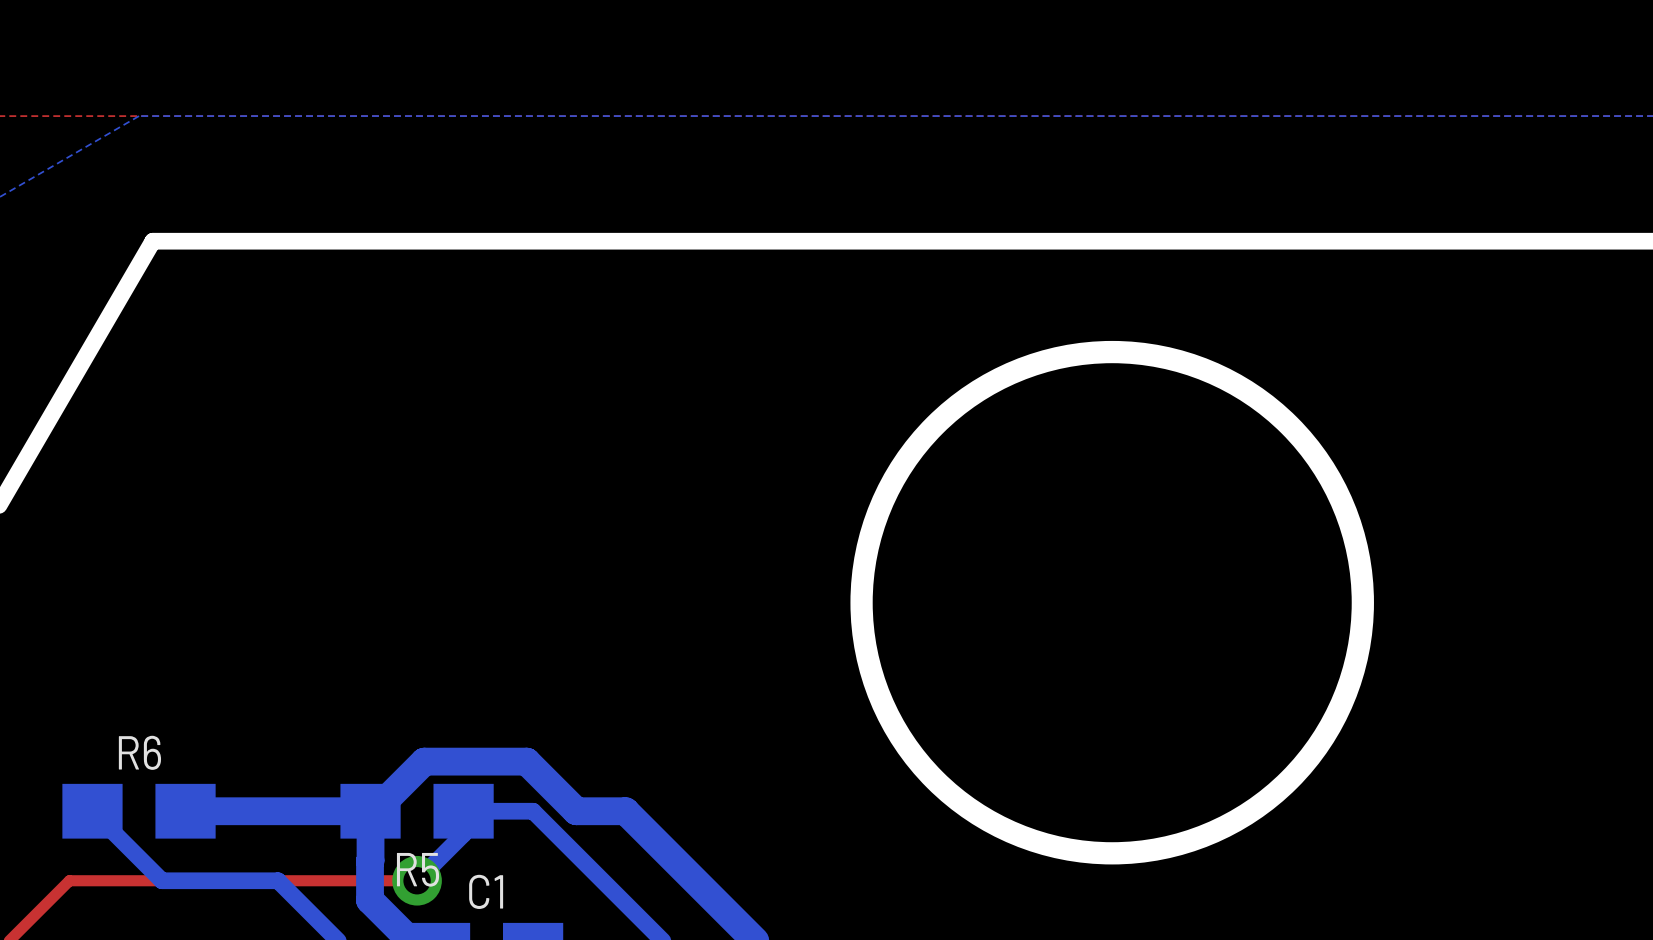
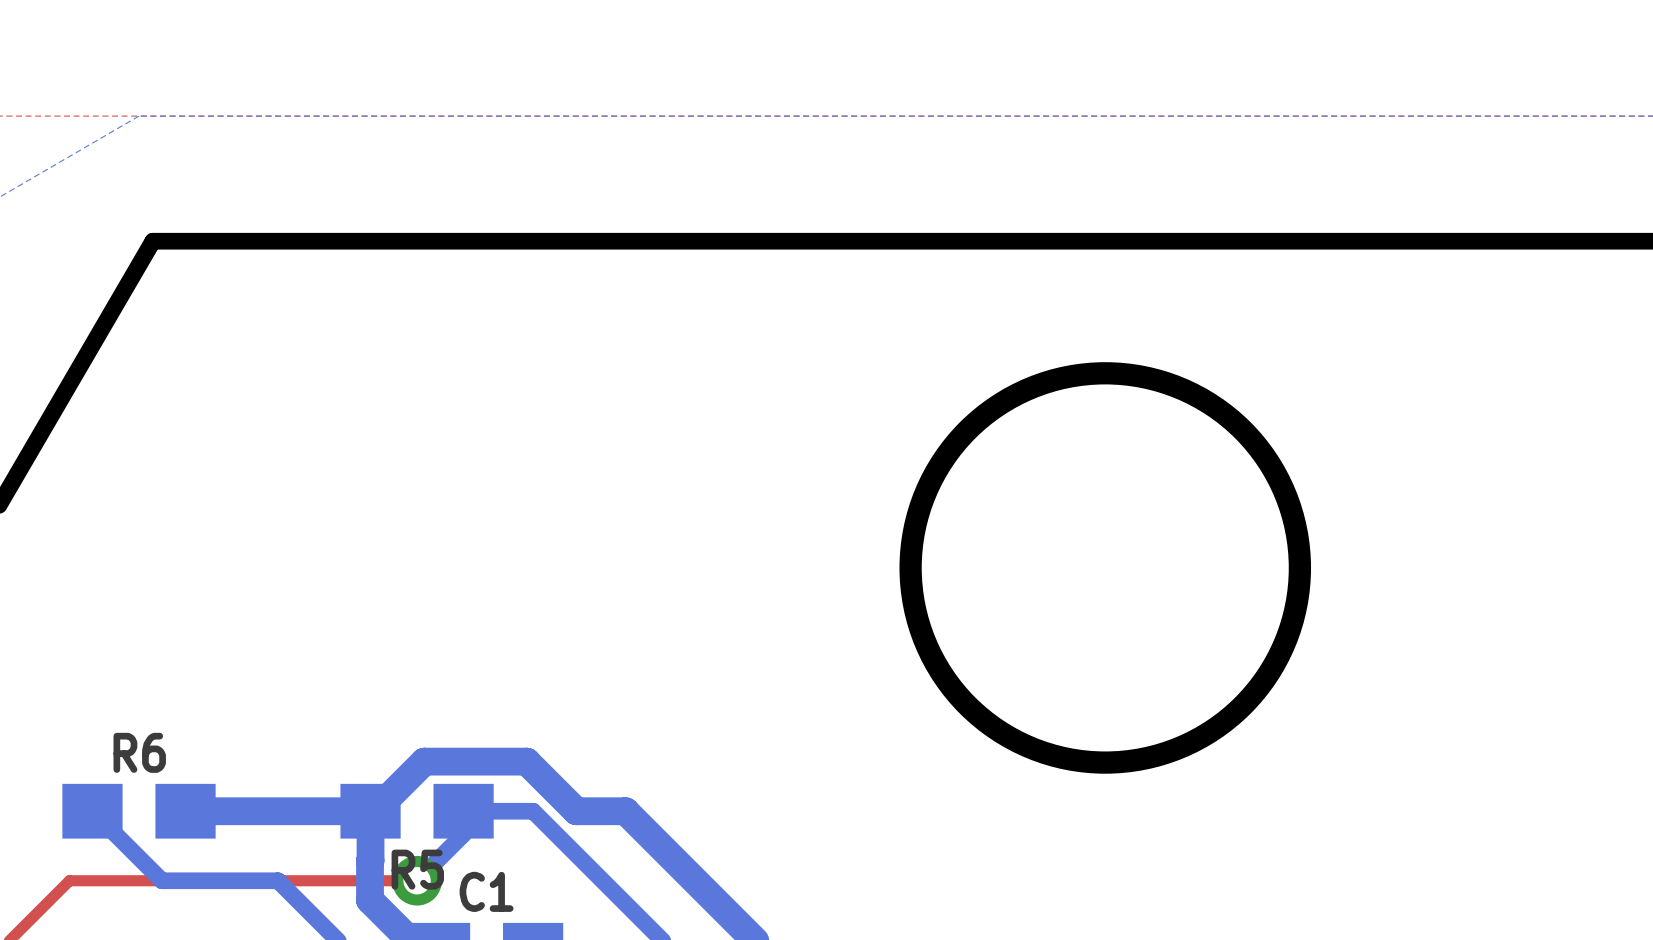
round board edge size: [850, 340, 1374, 865] -> [899, 362, 1312, 774]

